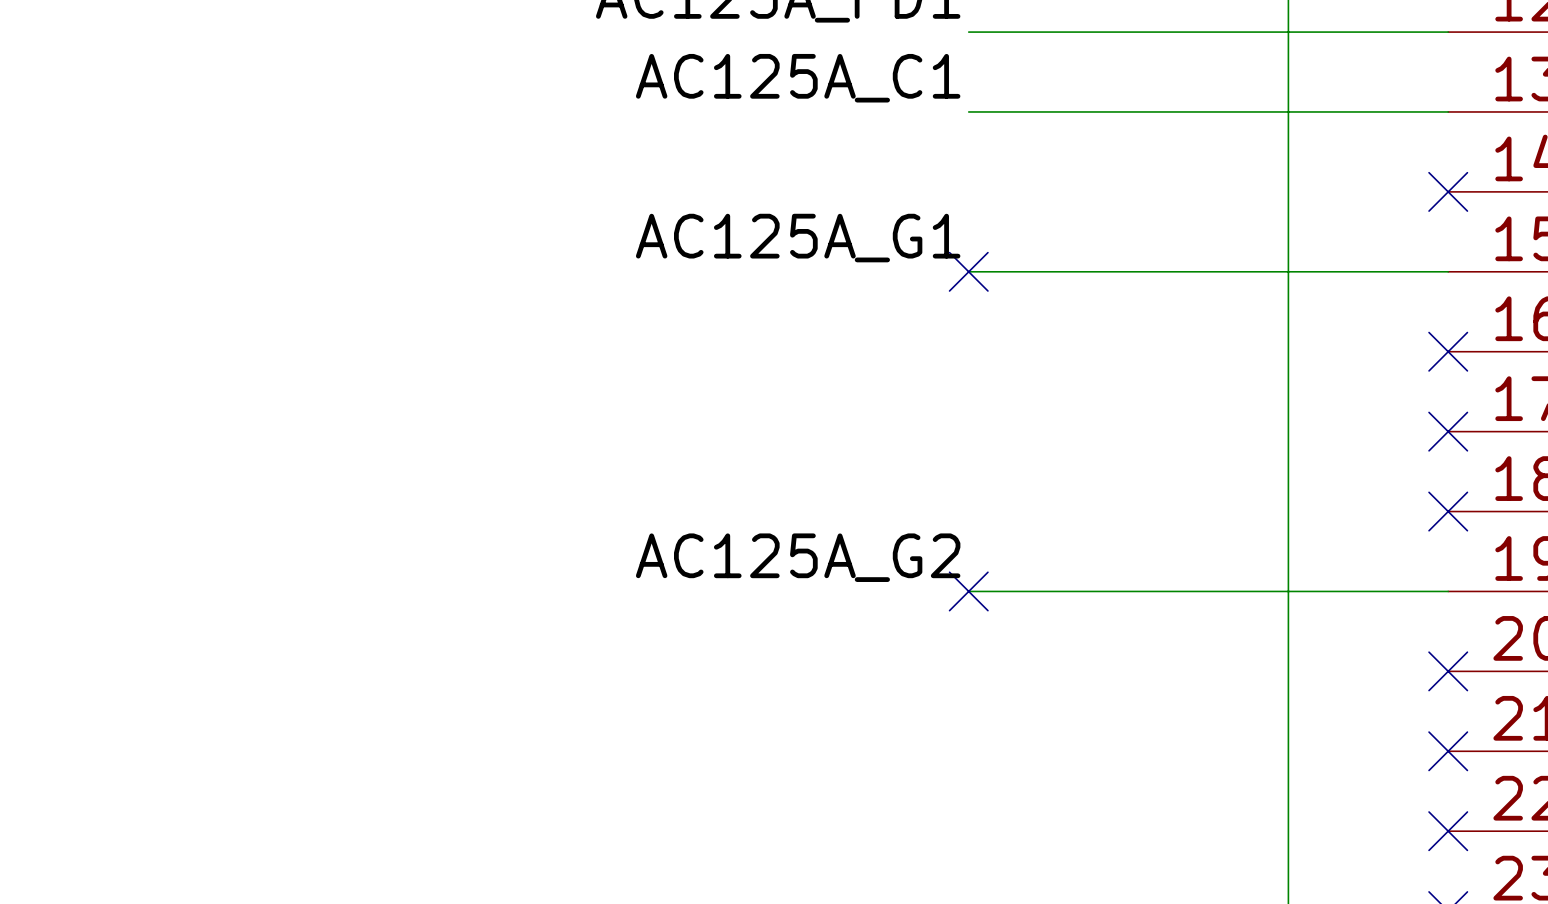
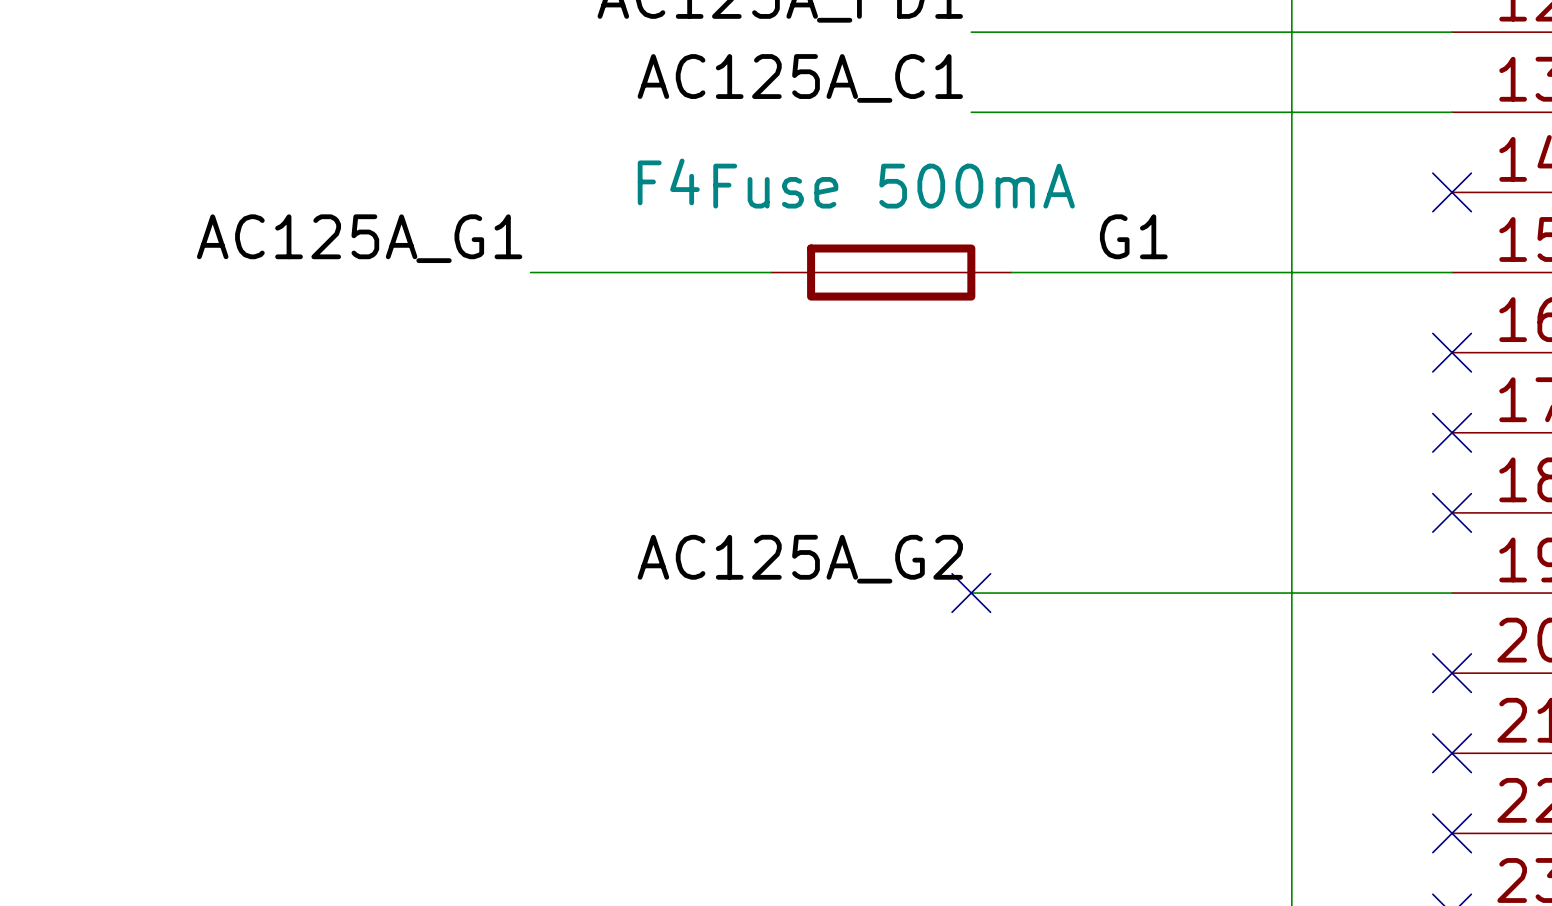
label: none -> G1 (1133, 236)
label position: AC125A_G1 (798, 238) -> AC125A_G1 (359, 238)
wire: none -> (530, 272) (771, 272)
F4: none -> Fuse 500mA (891, 272)
no-connect mark: (968, 271) -> none

